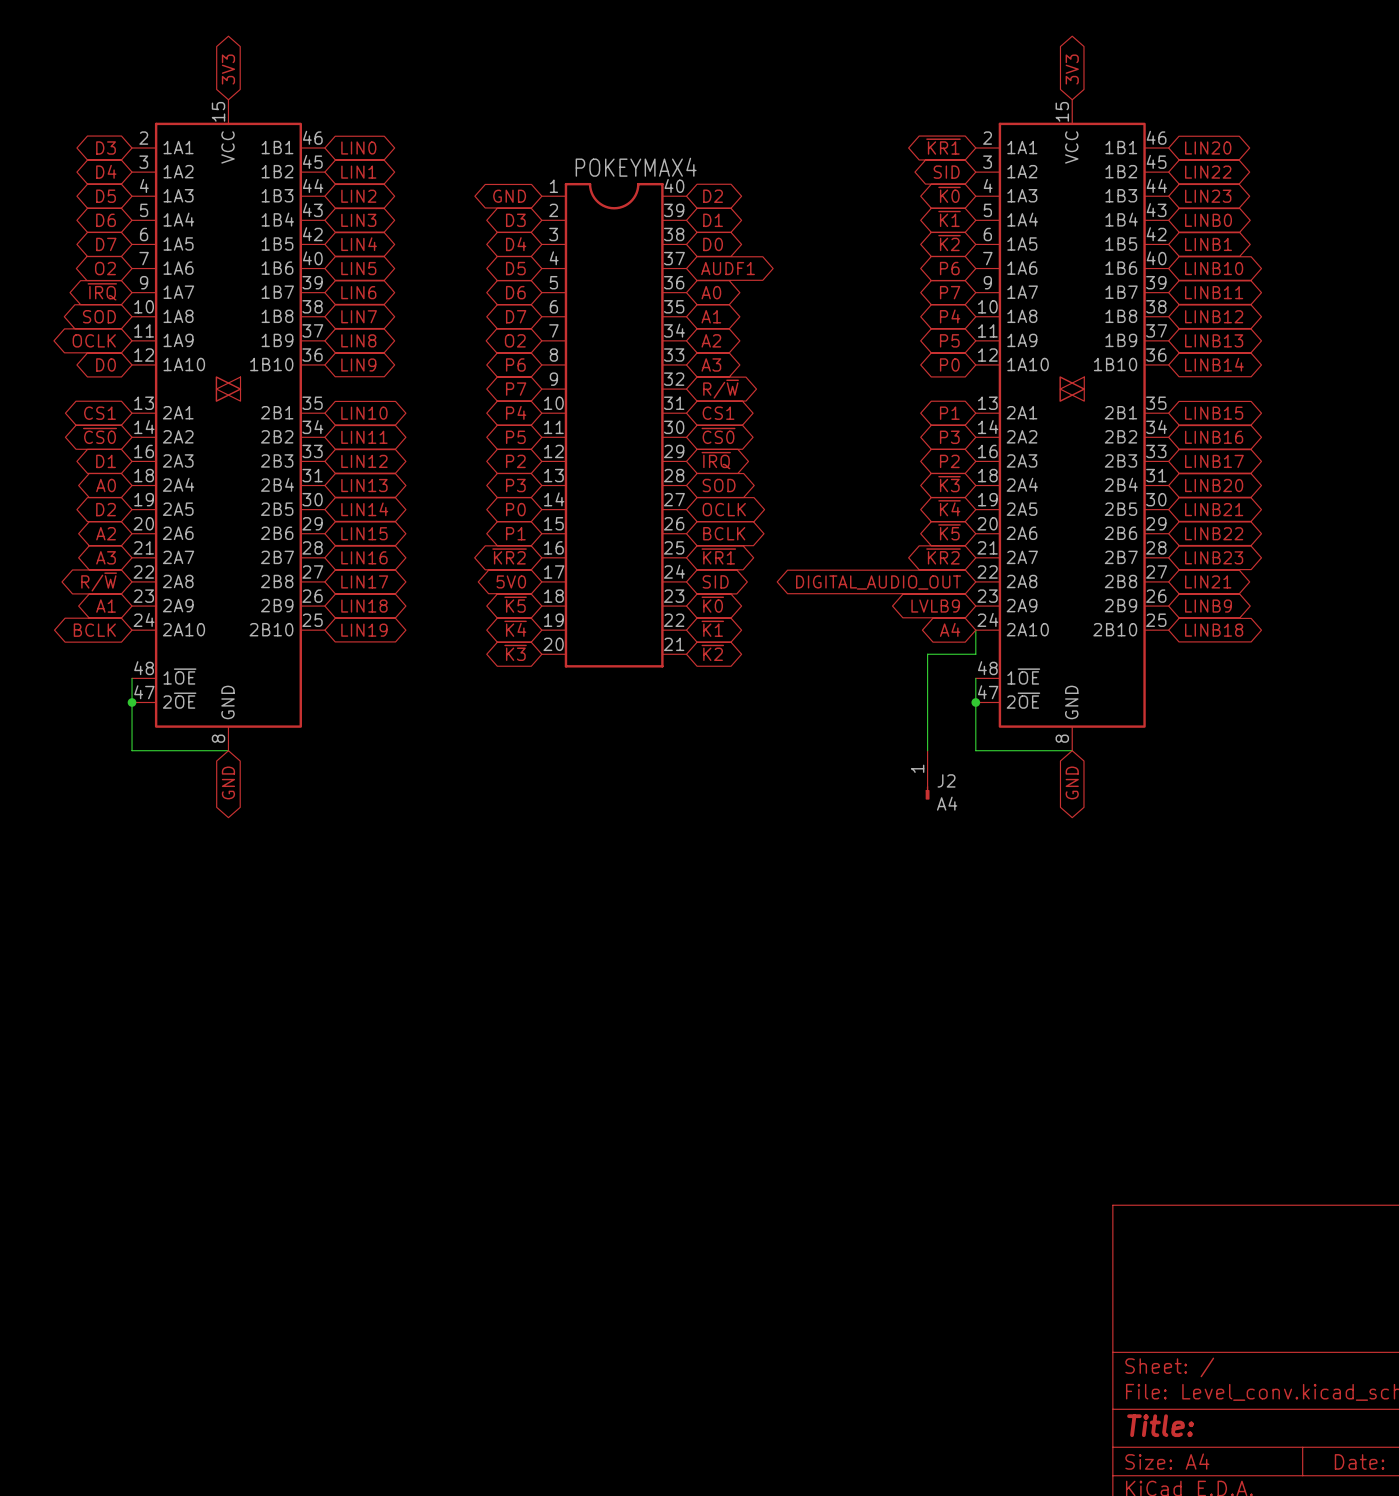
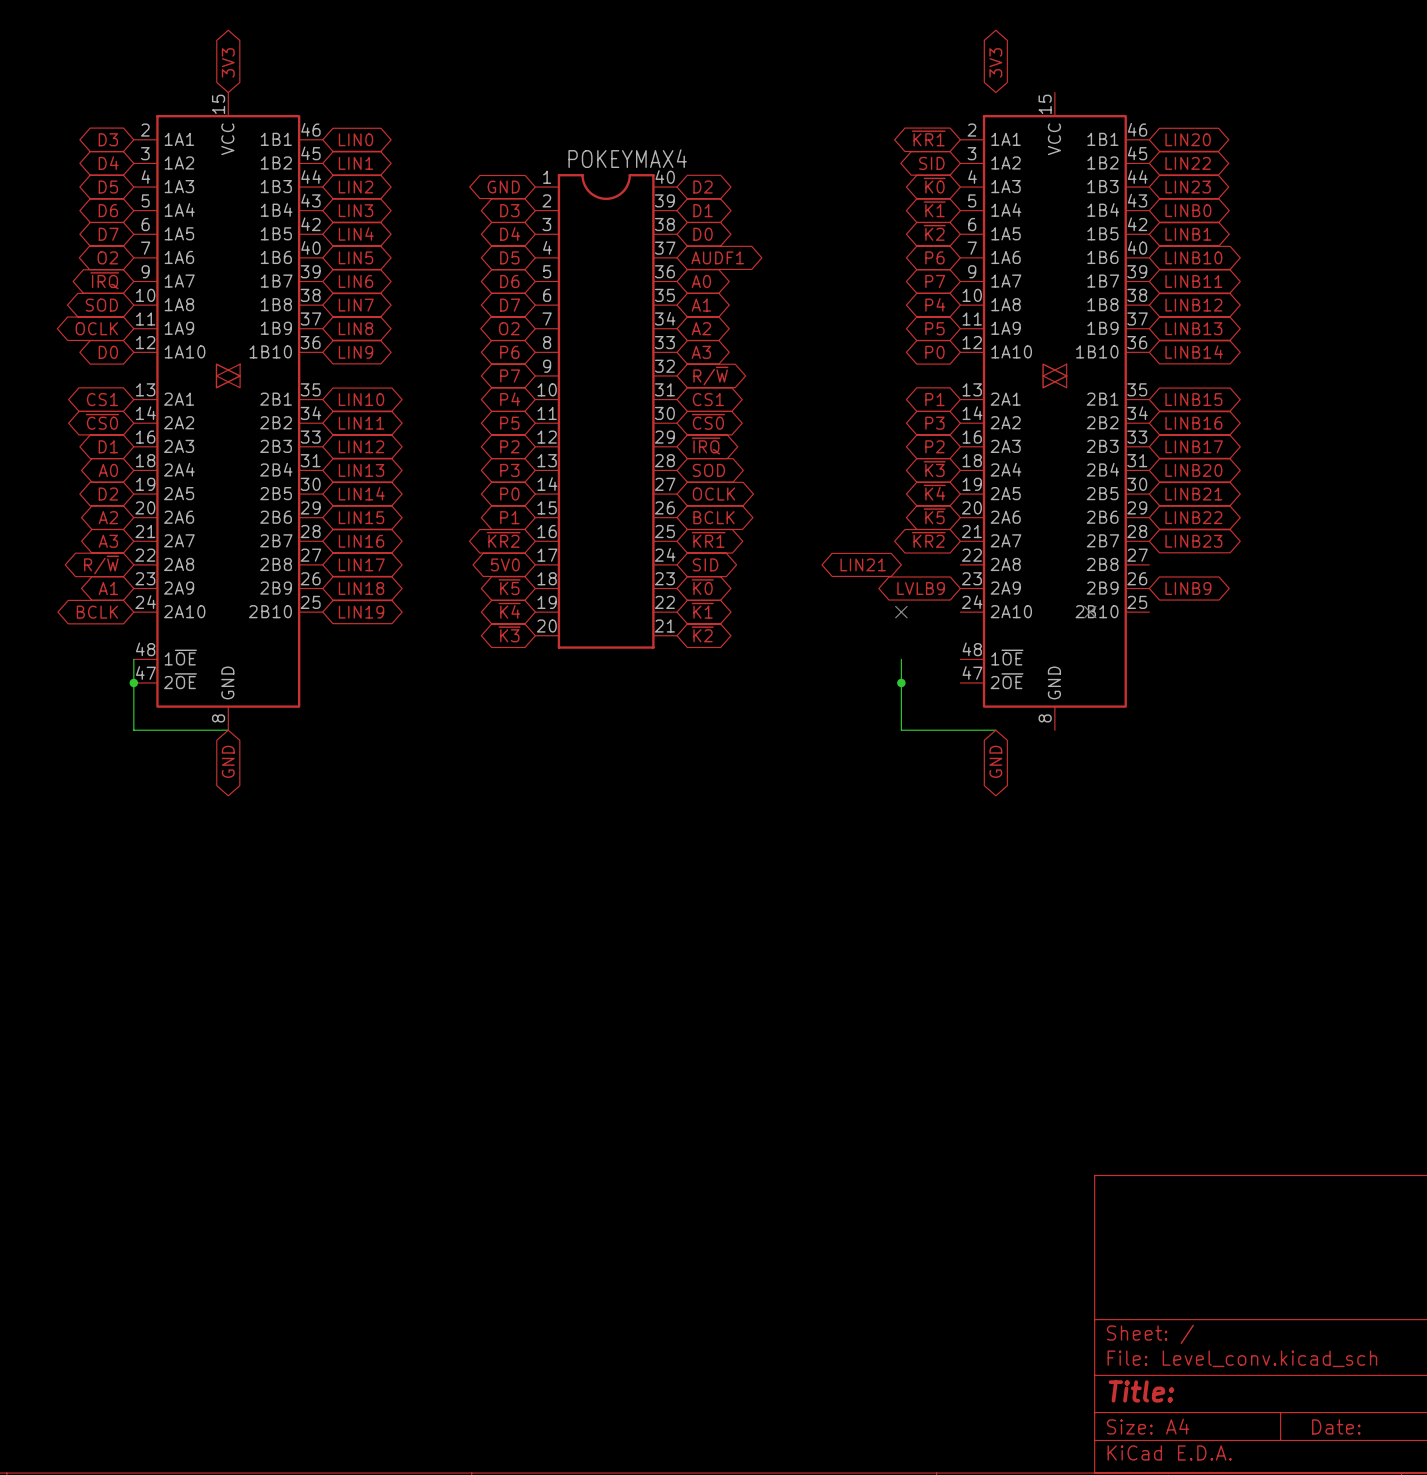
global label position: 3V3 (1072, 69) -> 3V3 (995, 62)
global label: none -> LIN21 (863, 564)
global label: LIN21 (1208, 581) -> none
global label: DIGITAL_AUDIO_OUT (878, 582) -> none
global label: A4 (950, 629) -> none
no-connect mark: none -> (901, 612)
wire: (975, 630) (975, 654) (927, 654) (927, 750) -> none
no-connect mark: none -> (1090, 612)
global label: LINB18 (1214, 630) -> none
wire: (975, 678) (975, 750) -> (901, 659) (901, 730) (960, 730)
junction: none -> (901, 682)
junction: (975, 702) -> none
wire: (1011, 750) (1072, 750) -> none
J2: A4 (927, 775) -> none
global label position: GND (1072, 782) -> GND (995, 761)

